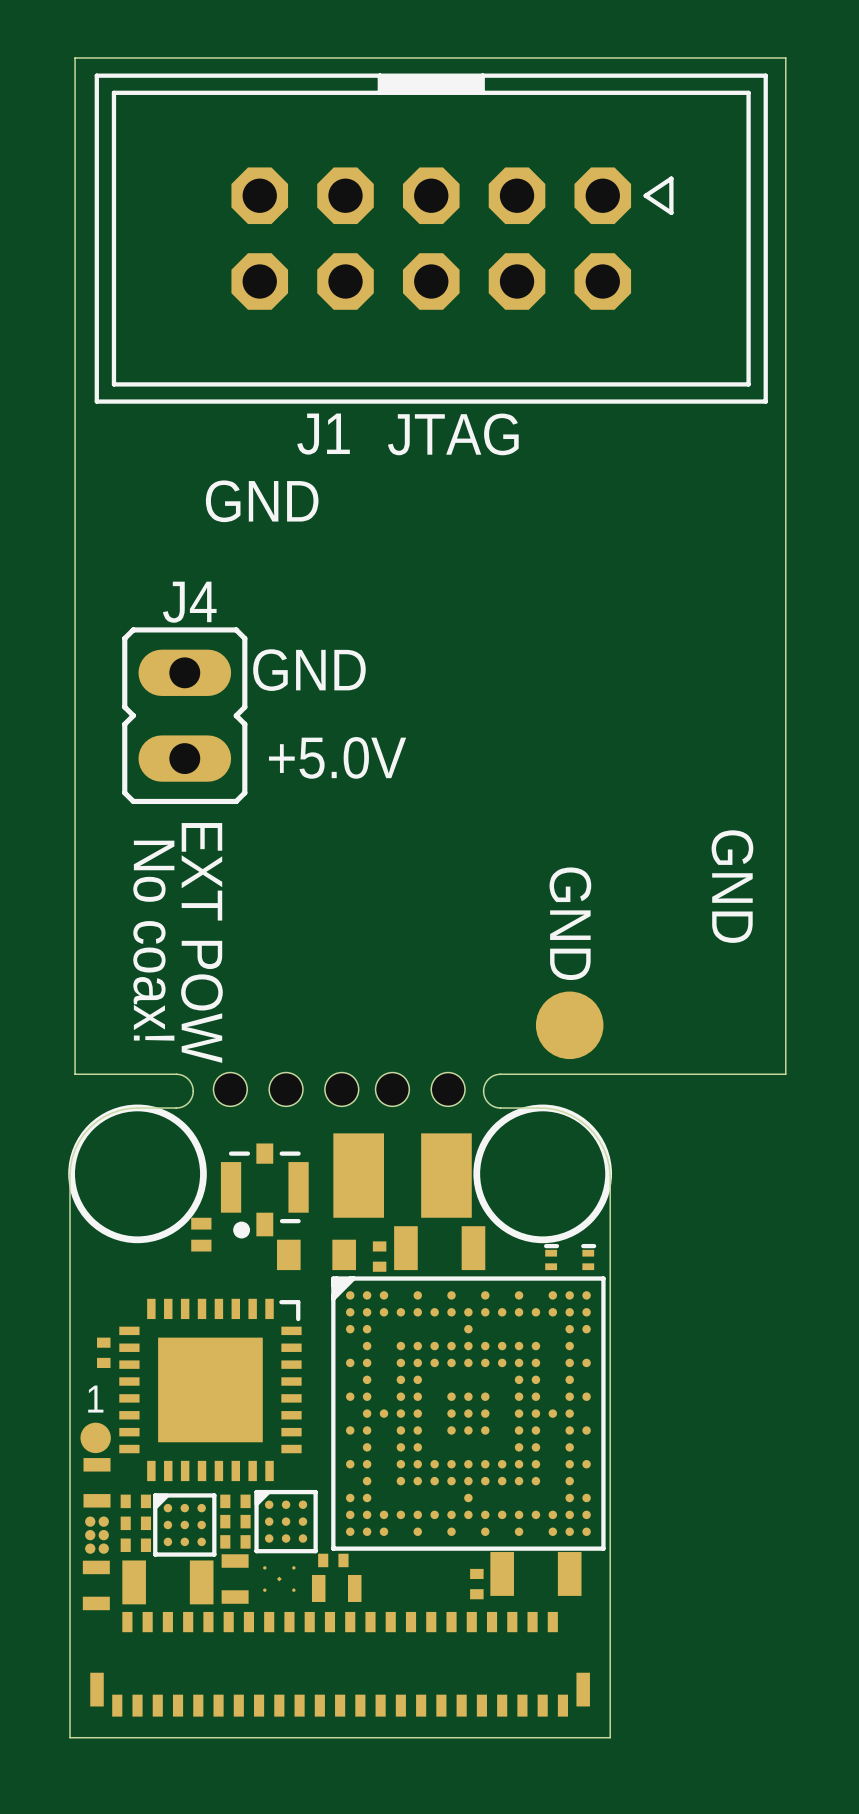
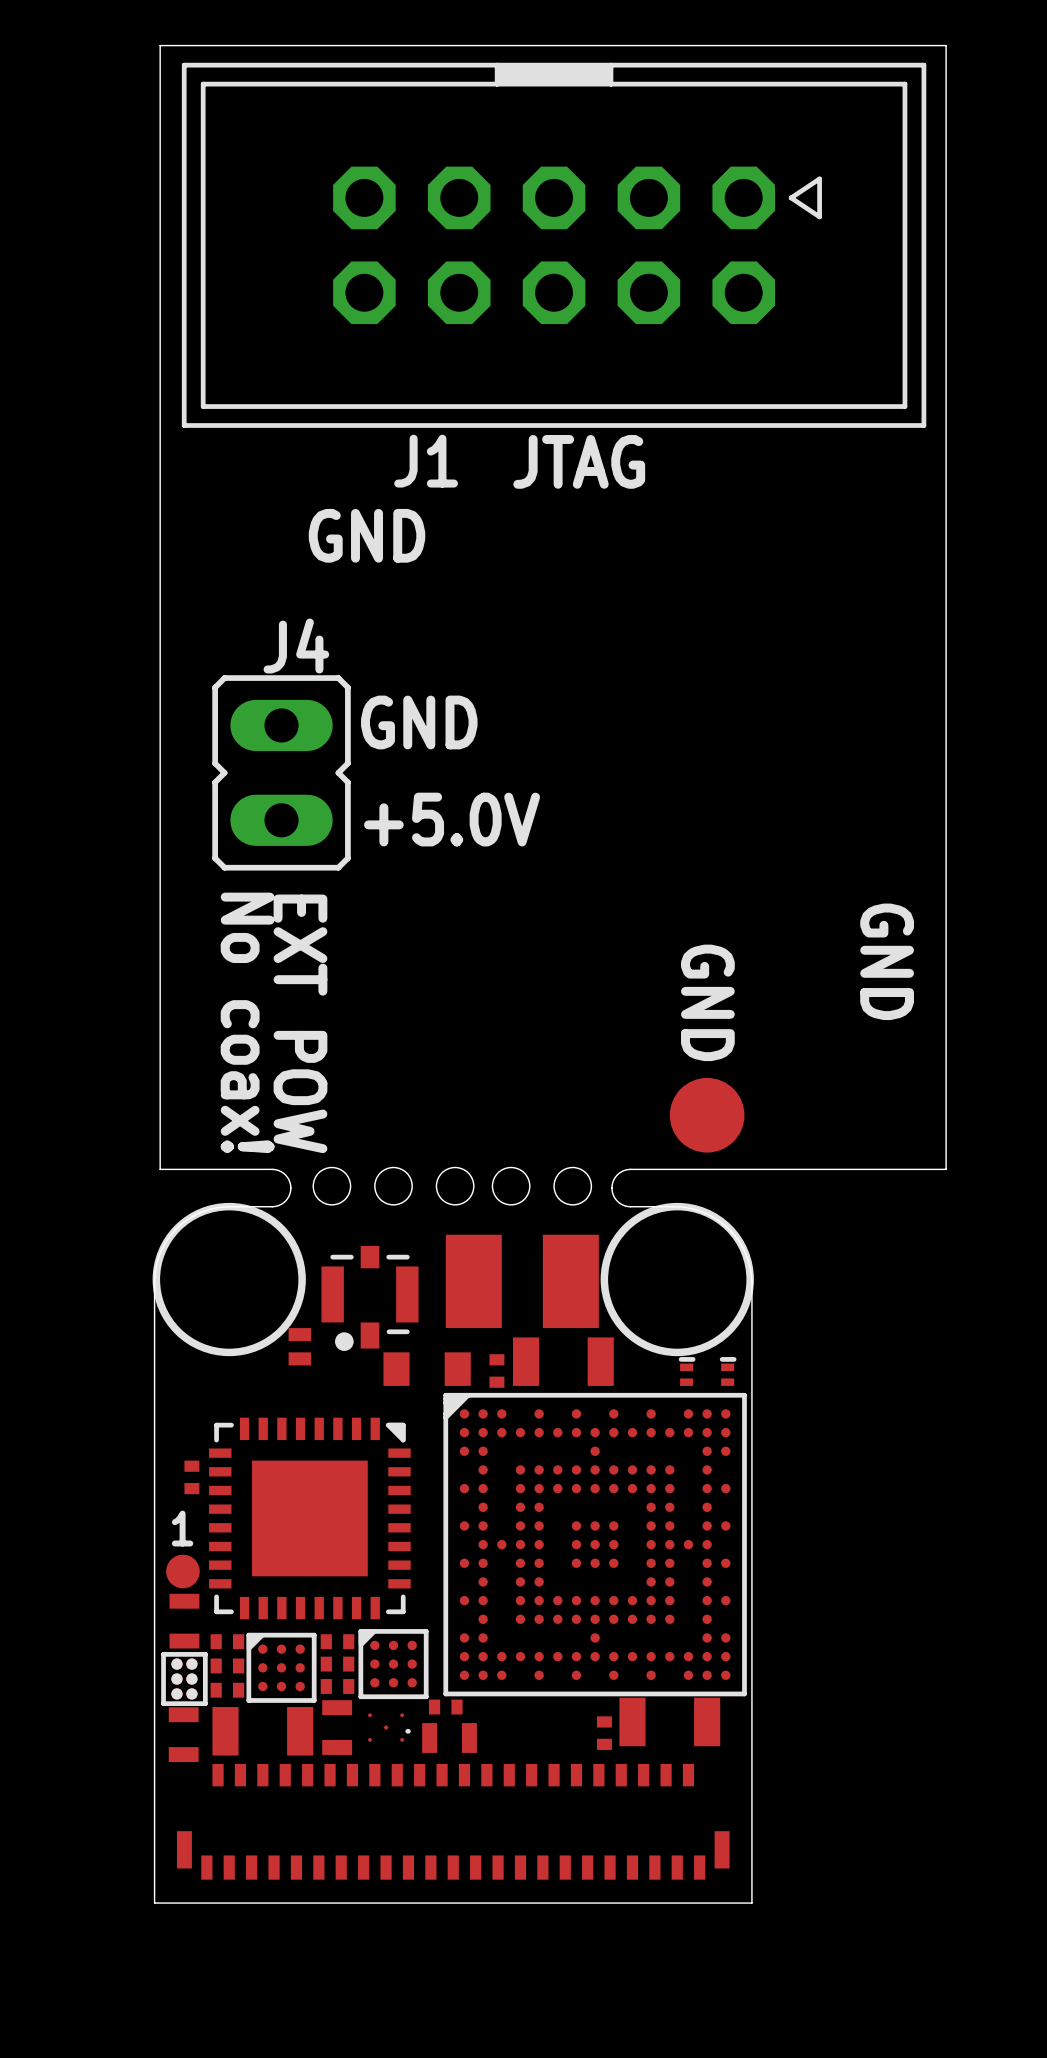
part footprint: [119, 1298, 302, 1482] -> [209, 1417, 411, 1620]
part footprint: [85, 1516, 109, 1554] -> [161, 1652, 208, 1707]
part footprint: [263, 1566, 296, 1592] -> [368, 1713, 411, 1742]

